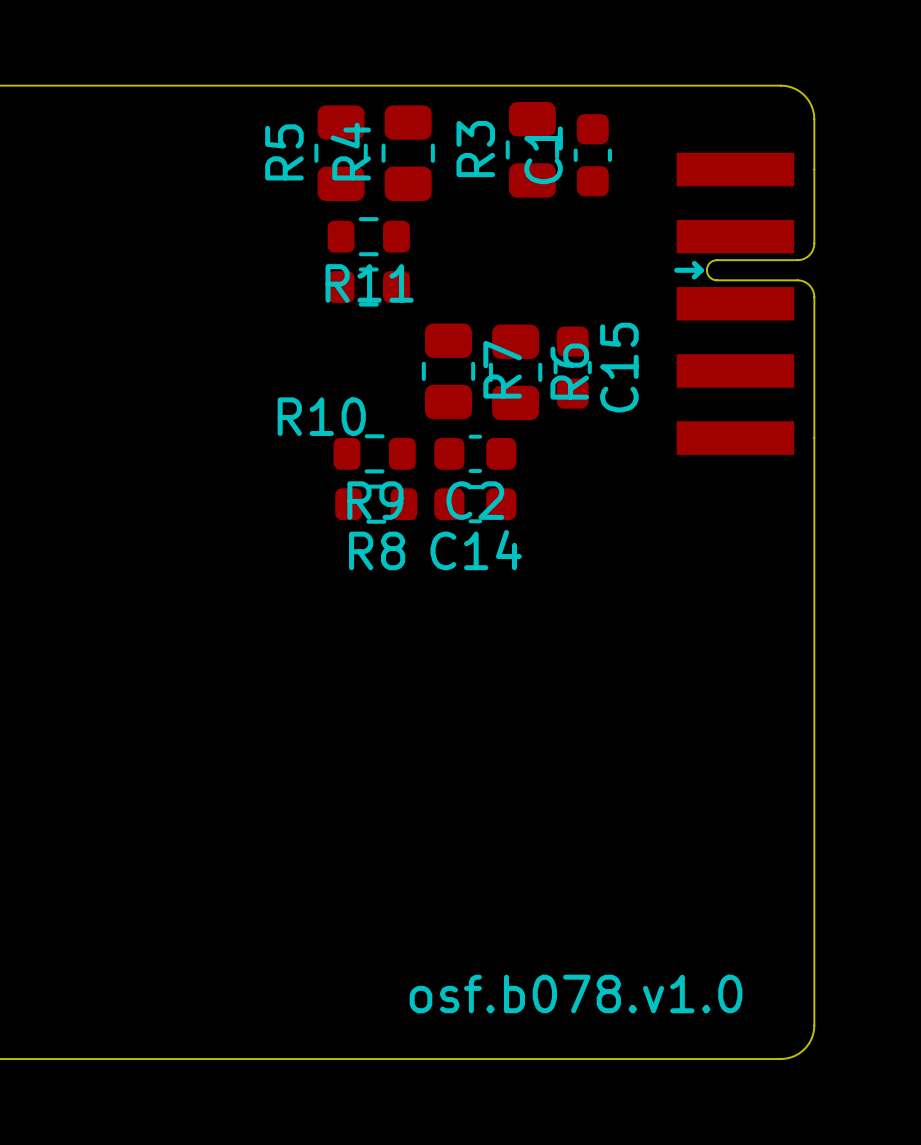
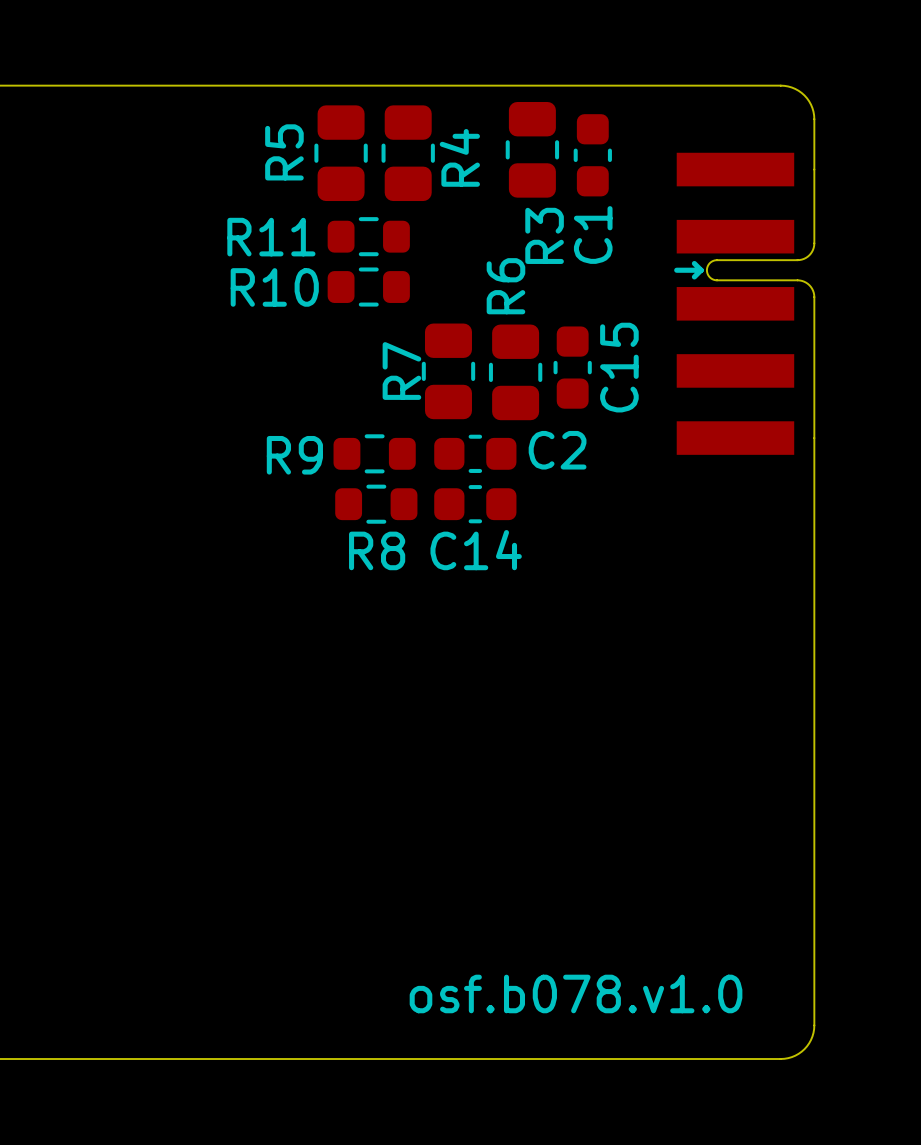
R3 name position: R3 (475, 149) -> R3 (544, 235)
R4 name position: R4 (350, 151) -> R4 (459, 157)
C1 name position: C1 (543, 155) -> C1 (593, 235)
R11 name position: R11 (369, 283) -> R11 (271, 237)
R7 name position: R7 (502, 369) -> R7 (401, 371)
R6 name position: R6 (569, 371) -> R6 (505, 286)
R10 name position: R10 (321, 416) -> R10 (274, 287)
R9 name position: R9 (375, 500) -> R9 (294, 455)
C2 name position: C2 (475, 500) -> C2 (557, 450)

